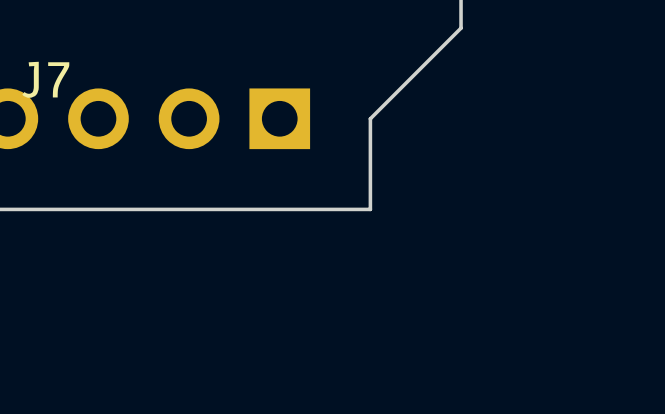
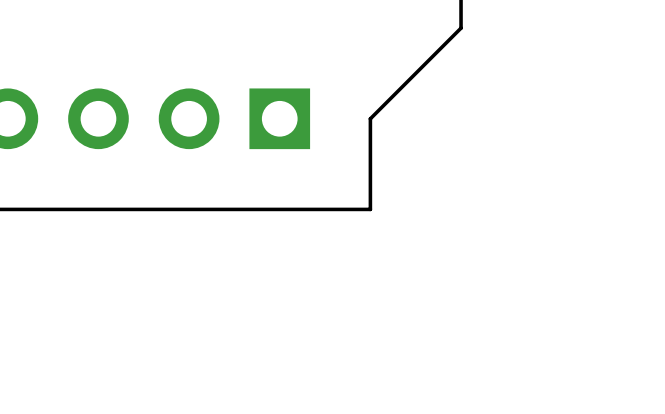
J7 name: J7 (45, 79) -> none

